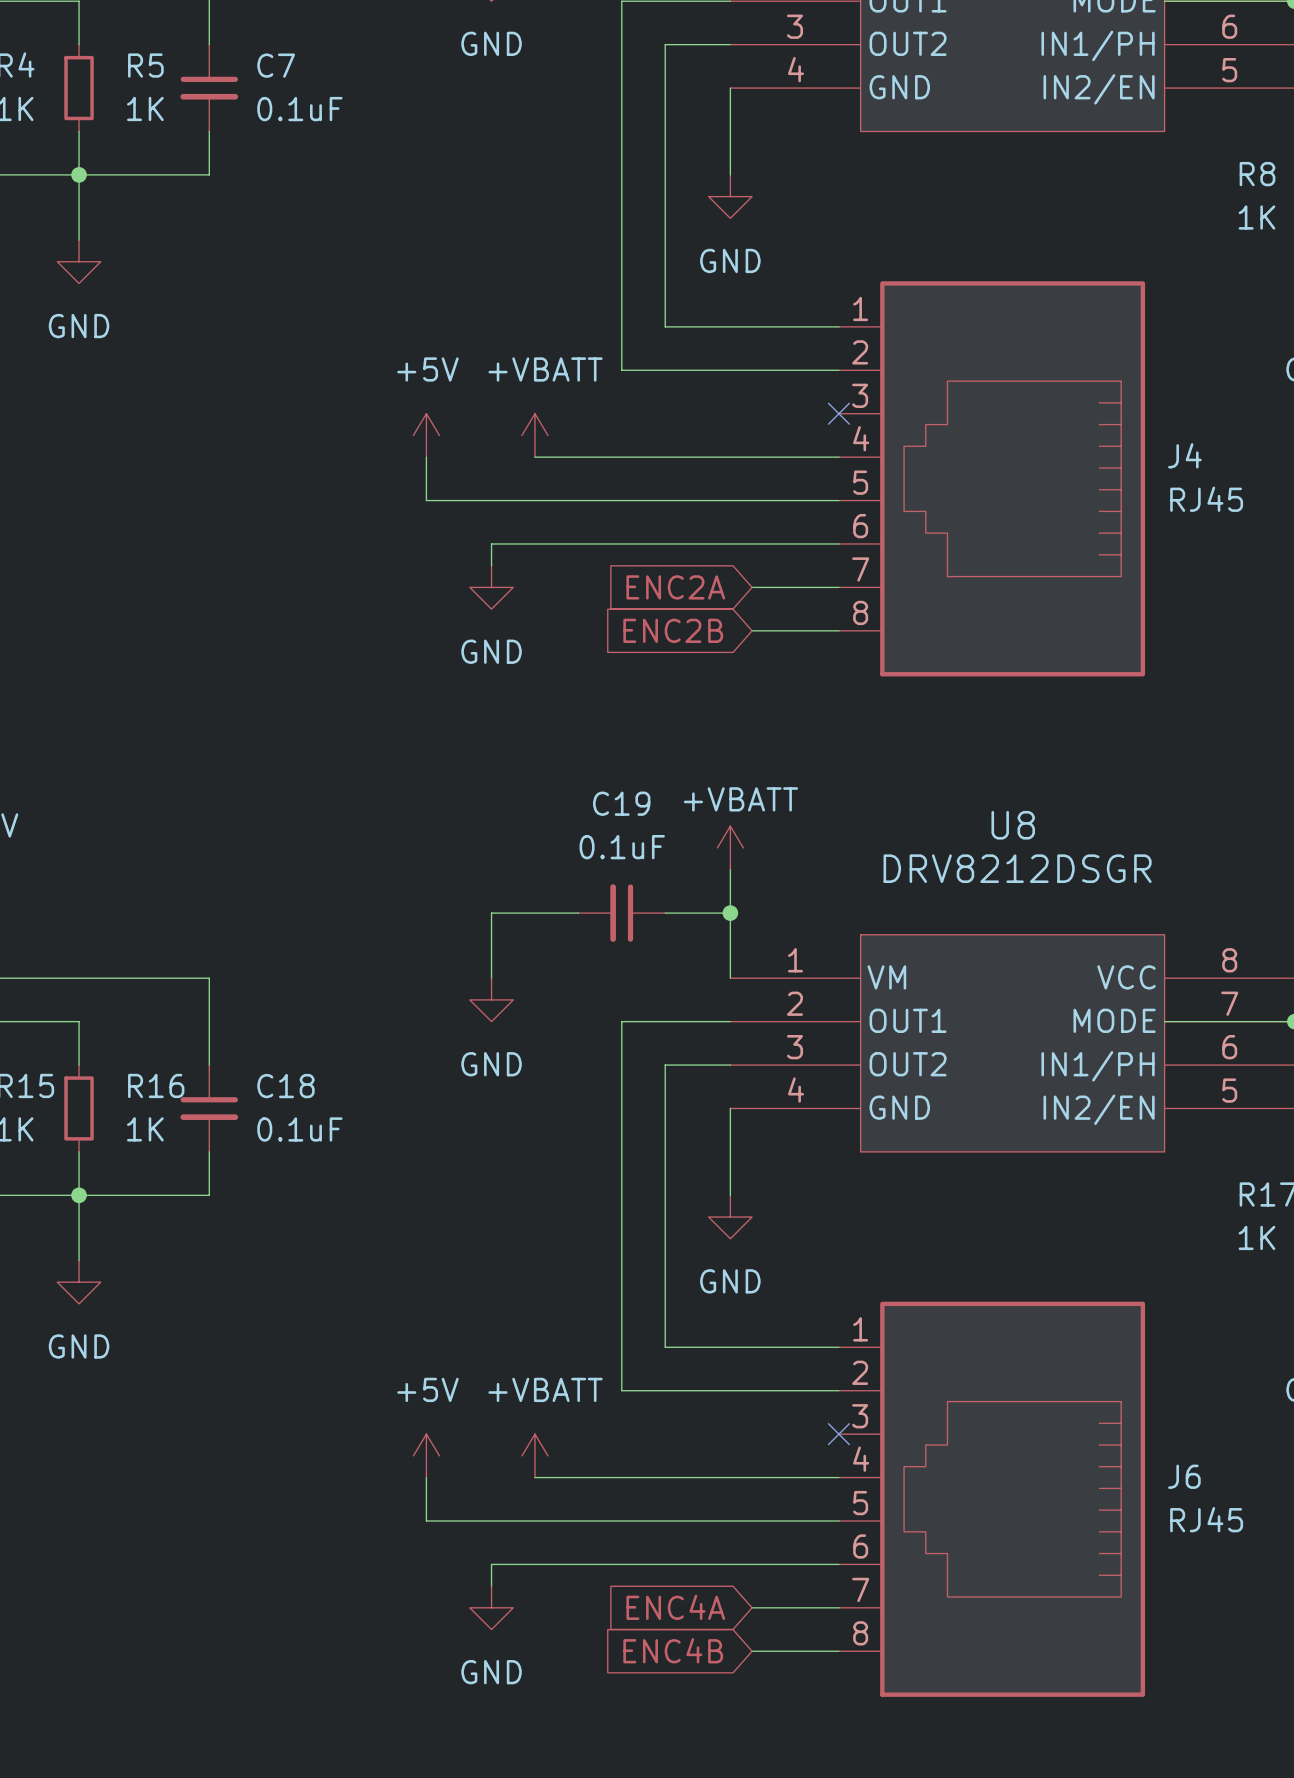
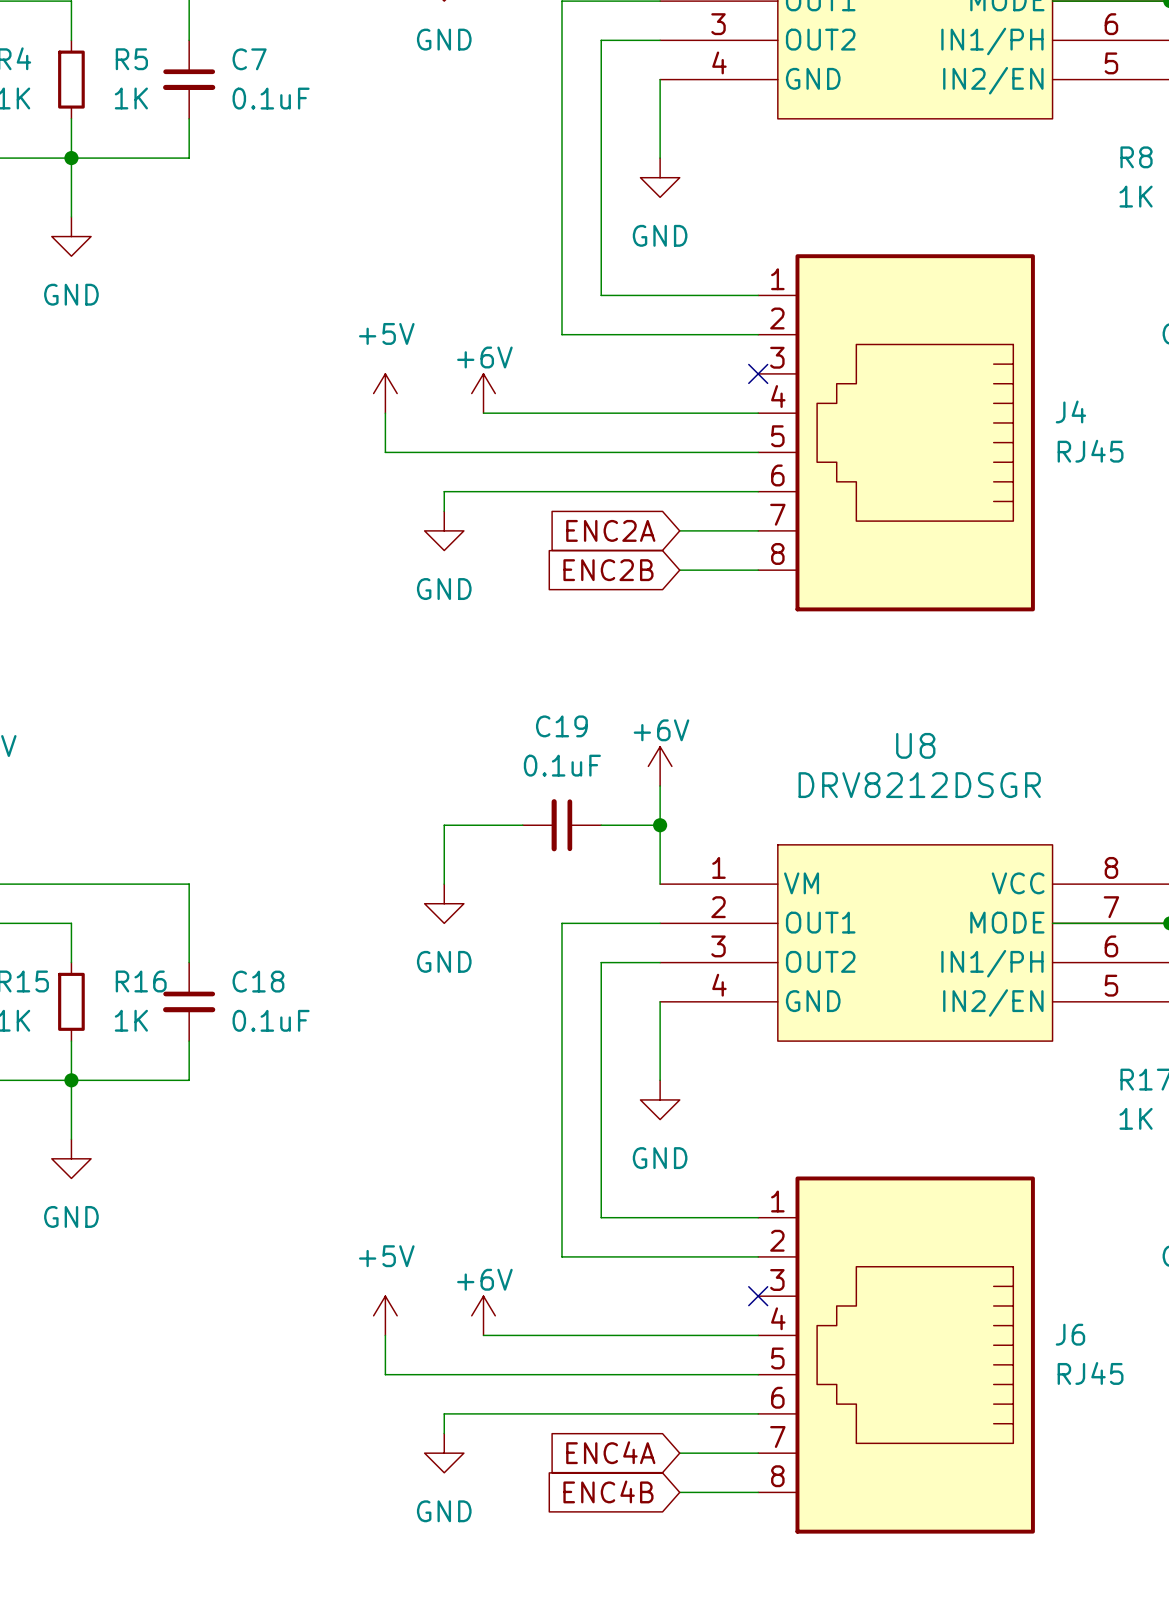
power symbol: +VBATT (534, 435) -> +6V (483, 393)
power symbol: +VBATT (730, 847) -> +6V (660, 766)
power symbol: +VBATT (534, 1455) -> +6V (483, 1315)

